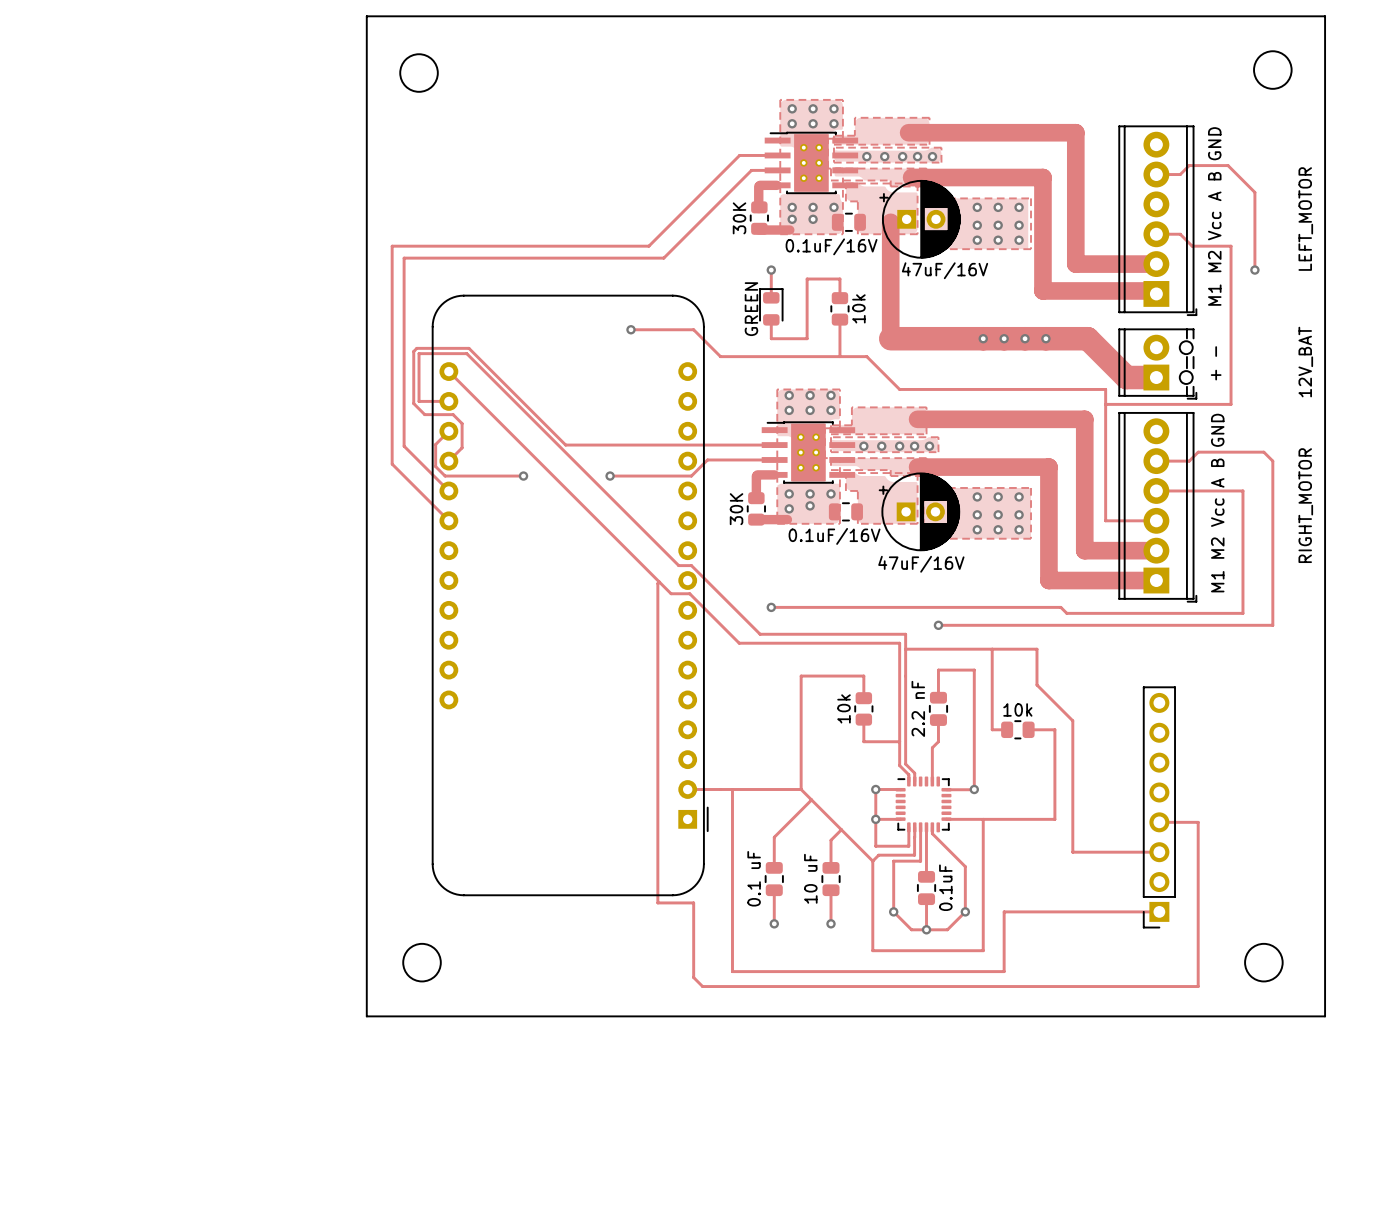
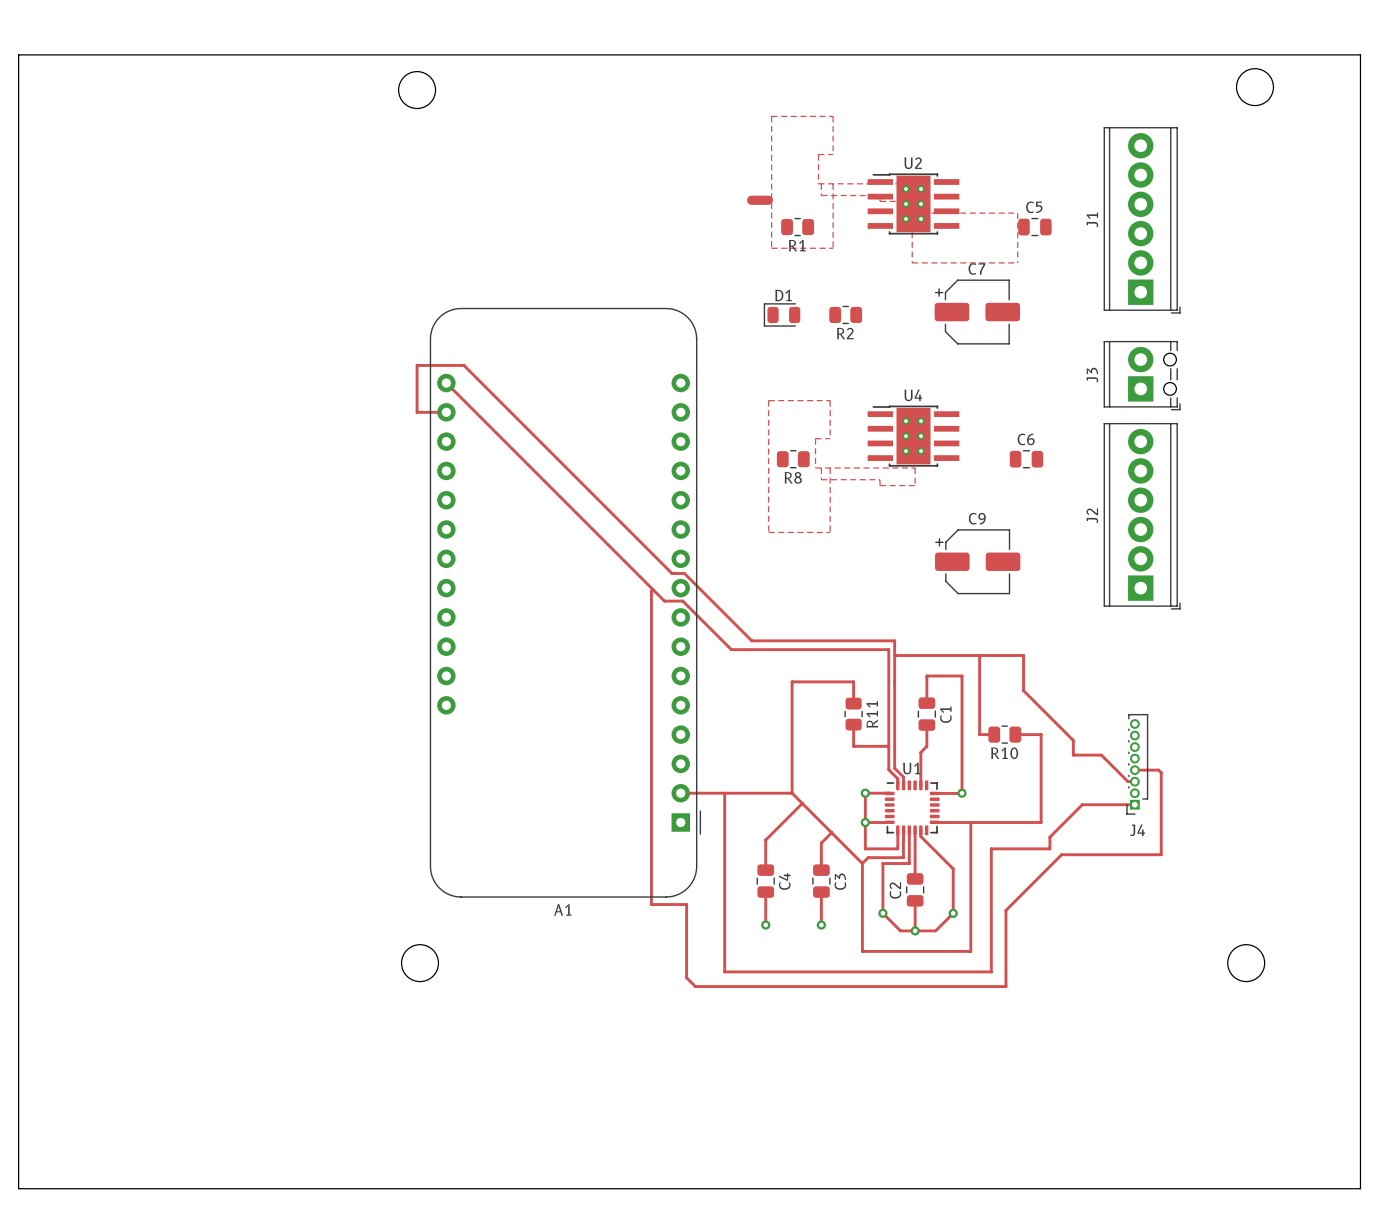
board edge: (366, 16) (1325, 16) (1325, 1016) (366, 1016) (366, 16) -> (18, 54) (18, 1188) (1360, 1188) (1360, 54) (18, 54)
via: (792, 108) -> none
via: (813, 108) -> none
via: (833, 108) -> none
zone outline: (854, 117) (929, 117) (929, 144) (833, 144) (833, 135) (854, 135) (854, 117) -> none
via: (792, 123) -> none
via: (813, 123) -> none
via: (833, 123) -> none
track: (908, 132) (1075, 132) (1075, 264) (1147, 264) -> none
zone outline: (833, 147) (833, 162) (941, 162) (941, 147) (833, 147) -> none
track: (777, 155) (739, 155) (648, 246) (392, 246) (392, 464) (448, 520) -> none
via: (866, 156) -> none
via: (884, 156) -> none
via: (902, 156) -> none
via: (917, 156) -> none
via: (932, 156) -> none
part: (811, 162) -> none
track: (777, 170) (751, 170) (663, 258) (404, 258) (404, 446) (448, 490) -> none
track: (1156, 174) (1180, 174) (1189, 165) (1228, 165) (1254, 192) (1254, 270) -> none
track: (911, 177) (1042, 177) (1042, 290) (1150, 290) -> none
zone outline: (845, 183) (917, 183) (917, 234) (857, 234) (857, 201) (845, 201) (845, 183) -> none
track: (758, 186) (758, 208) -> none
U2: none -> (913, 203)
J1: none -> (1142, 220)
via: (792, 207) -> none
via: (813, 207) -> none
via: (833, 207) -> none
via: (977, 207) -> none
via: (998, 207) -> none
via: (1019, 207) -> none
R1: none -> (797, 227)
C5: none -> (1034, 227)
text: M1 M2 Vcc A B GND (1214, 216) -> none
part: 30K (759, 218) -> none
via: (792, 219) -> none
via: (813, 219) -> none
part: 47uF/16V (920, 219) -> none
part: LEFT_MOTOR (1157, 220) -> none
part: 0.1uF/16V (848, 222) -> none
track: (890, 222) (890, 338) (1087, 338) (1126, 377) (1156, 377) -> none
via: (977, 225) -> none
via: (998, 225) -> none
via: (1019, 225) -> none
track: (758, 230) (789, 230) -> none
track: (1156, 234) (1180, 234) (1192, 246) (1231, 246) (1231, 404) (1105, 404) -> none
via: (977, 240) -> none
via: (998, 240) -> none
via: (1019, 240) -> none
track: (771, 270) (771, 297) -> none
via: (771, 270) -> none
via: (1254, 270) -> none
track: (839, 298) (839, 279) (807, 279) (807, 338) (771, 338) (771, 319) -> none
C7: none -> (977, 312)
D1: none -> (782, 314)
R2: none -> (845, 314)
part: GREEN (771, 306) -> none
part: 10k (839, 308) -> none
track: (839, 319) (839, 356) -> none
track: (630, 329) (693, 329) (720, 356) (866, 356) (899, 389) (1105, 389) (1105, 520) (1156, 520) -> none
via: (630, 329) -> none
via: (983, 338) -> none
via: (1004, 338) -> none
via: (1025, 338) -> none
via: (1045, 338) -> none
J3 name: none -> J3 (1092, 375)
J3 value: 12V_BAT (1305, 362) -> none
text: + - (1216, 363) -> none
via: (789, 395) -> none
via: (810, 395) -> none
via: (831, 395) -> none
zone outline: (851, 407) (926, 407) (926, 434) (831, 434) (831, 425) (851, 425) (851, 407) -> none
via: (789, 410) -> none
via: (810, 410) -> none
via: (831, 410) -> none
track: (917, 419) (1084, 419) (1084, 550) (1156, 550) -> none
U4: none -> (913, 436)
track: (448, 431) (435, 444) (435, 466) (445, 476) (523, 476) -> none
zone outline: (831, 437) (831, 452) (938, 452) (938, 437) (831, 437) -> none
track: (774, 445) (565, 445) (468, 348) (416, 348) (413, 351) (413, 403) (424, 414) (453, 414) (462, 423) (462, 447) (448, 461) -> none
via: (863, 446) -> none
via: (881, 446) -> none
via: (899, 446) -> none
via: (914, 446) -> none
via: (929, 446) -> none
R8: none -> (793, 459)
C6: none -> (1026, 459)
part: (808, 452) -> none
track: (774, 459) (707, 459) (691, 476) (610, 476) -> none
track: (1156, 461) (1189, 461) (1198, 452) (1263, 452) (1272, 461) (1272, 625) (938, 625) -> none
track: (917, 467) (1048, 467) (1048, 580) (1156, 580) -> none
zone outline: (845, 473) (845, 490) (857, 490) (857, 523) (917, 523) (917, 473) (845, 473) -> none
track: (774, 474) (756, 476) (756, 498) -> none
via: (523, 476) -> none
via: (610, 476) -> none
zone outline: (923, 487) (923, 538) (1031, 538) (1031, 487) (923, 487) -> none
track: (1156, 490) (1242, 490) (1242, 613) (1066, 613) (1060, 607) (771, 607) -> none
via: (789, 493) -> none
via: (810, 493) -> none
via: (831, 493) -> none
via: (977, 496) -> none
via: (998, 496) -> none
via: (1019, 496) -> none
text: M1 M2 Vcc A B GND (1217, 503) -> none
via: (810, 505) -> none
J2 value: RIGHT_MOTOR (1305, 505) -> none
J2 name: none -> J2 (1092, 515)
part: 30K (756, 508) -> none
via: (789, 508) -> none
part: 0.1uF/16V (845, 511) -> none
part: 47uF/16V (919, 511) -> none
via: (977, 514) -> none
via: (998, 514) -> none
via: (1019, 514) -> none
track: (756, 519) (787, 519) -> none
via: (977, 529) -> none
via: (998, 529) -> none
via: (1019, 529) -> none
C9: none -> (977, 561)
via: (771, 607) -> none
via: (938, 625) -> none
R11 value: 10k (844, 708) -> none
R11 name: none -> R11 (872, 714)
C1 value: 2.2 nF (918, 708) -> none
C1 name: none -> C1 (945, 714)
R10 value: 10k (1017, 709) -> none
track: (1072, 720) (1072, 852) (1075, 852) -> (1058, 725) (1073, 740) (1073, 755) (1101, 755) (1127, 781) (1134, 781)
R10 name: none -> R10 (1004, 753)
J4: none -> (1137, 764)
U1 name: none -> U1 (911, 768)
track: none -> (1134, 770) (1158, 770) (1161, 772) (1161, 854) (1143, 854)
part: (1159, 807) -> none
track: (1159, 822) (1198, 822) (1198, 986) (1019, 986) -> (1061, 854) (1005, 910) (1005, 986)
C4 value: 0.1 uF (754, 878) -> none
C4 name: none -> C4 (784, 881)
C3 value: 10 uF (810, 878) -> none
C3 name: none -> C3 (840, 881)
C2 value: 0.1uF (945, 887) -> none
C2 name: none -> C2 (895, 890)
A1 name: none -> A1 (562, 909)
track: (1004, 911) (1159, 911) -> (991, 913) (991, 848) (1049, 848) (1049, 837) (1082, 804) (1134, 804)

